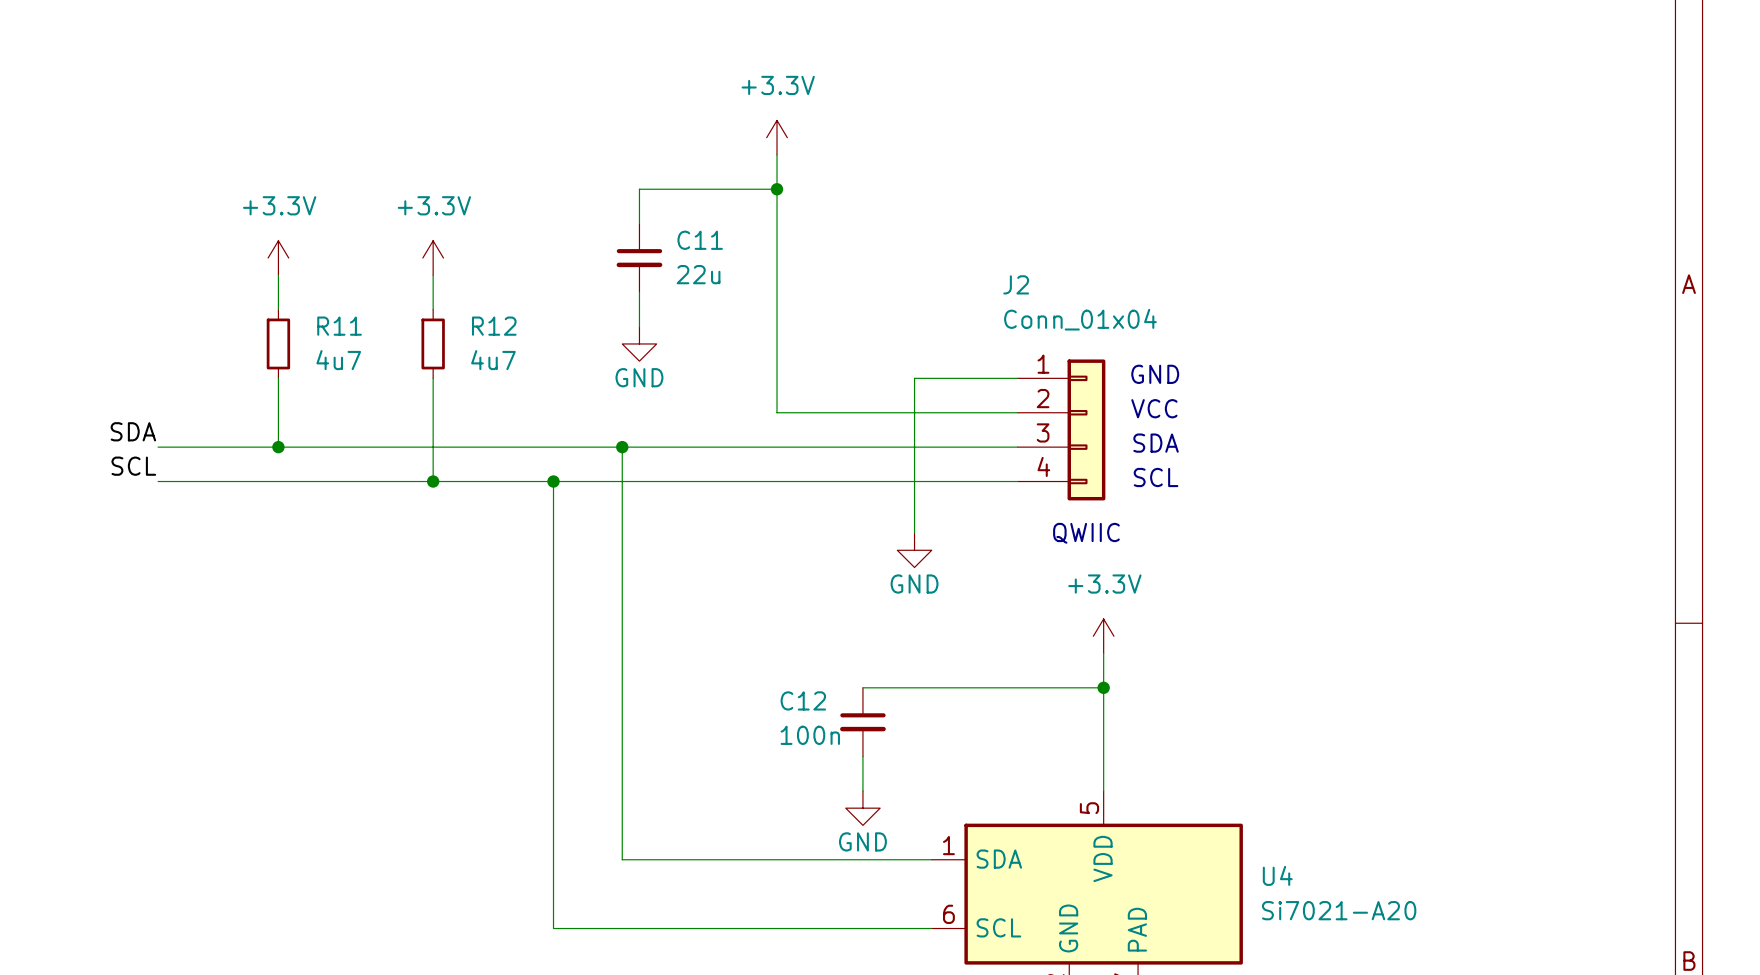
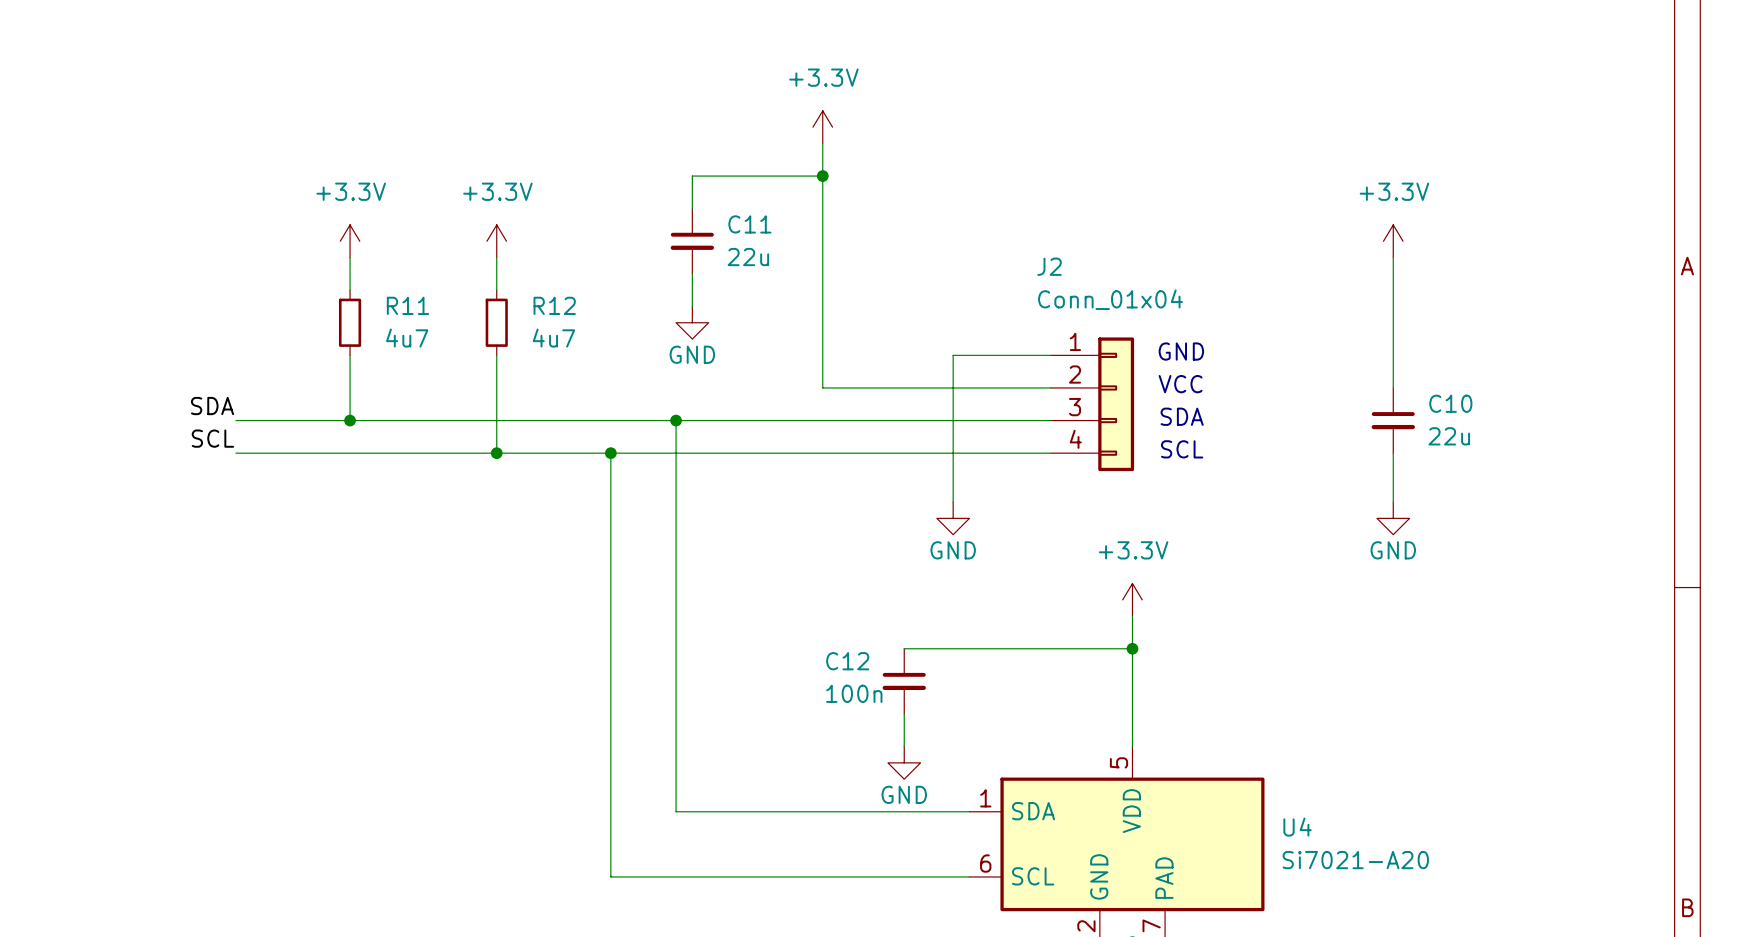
power symbol: none -> +3.3V (1393, 241)
wire: none -> (1393, 257) (1393, 387)
C10: none -> 22u (1393, 420)
wire: none -> (1393, 453) (1393, 502)
text: QWIIC (1086, 533) -> none
power symbol: none -> GND (1393, 518)

